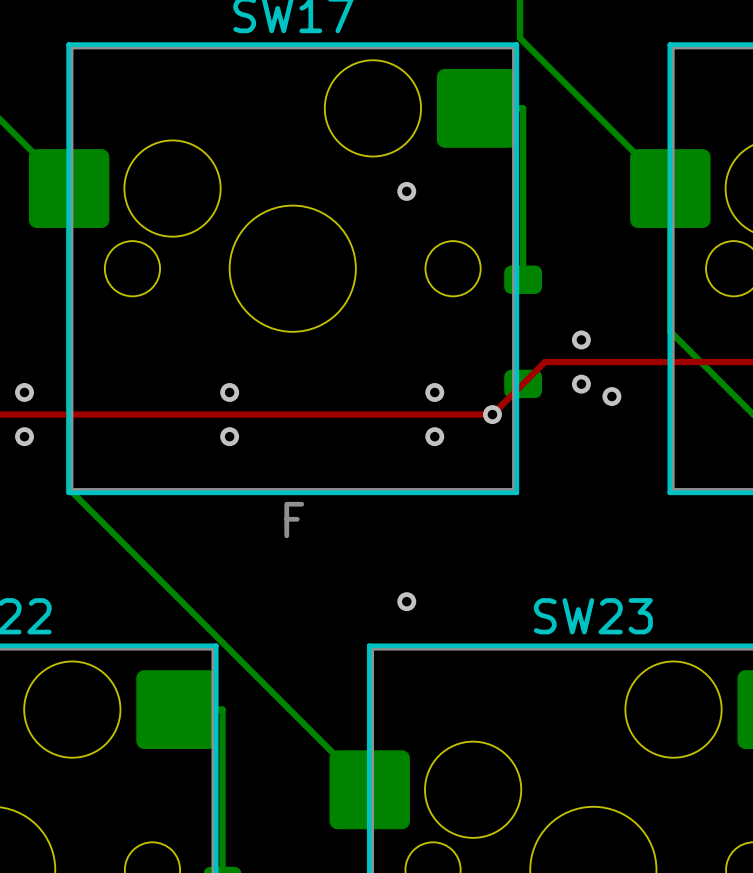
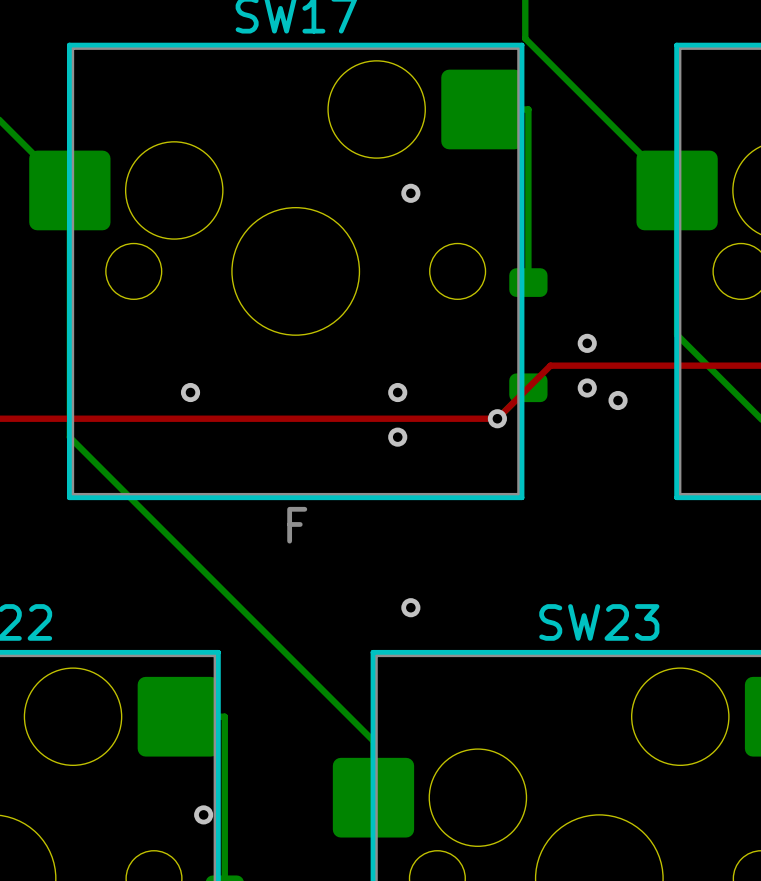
via: none -> (190, 392)
via: none -> (397, 392)
via: (24, 392) -> none
via: (229, 392) -> none
via: (434, 392) -> none
via: none -> (397, 437)
bottom track: (69, 433) (69, 489) (369, 789) -> (69, 437) (373, 740) (373, 797)
via: (24, 436) -> none
via: (229, 436) -> none
via: (434, 436) -> none
via: none -> (203, 814)

